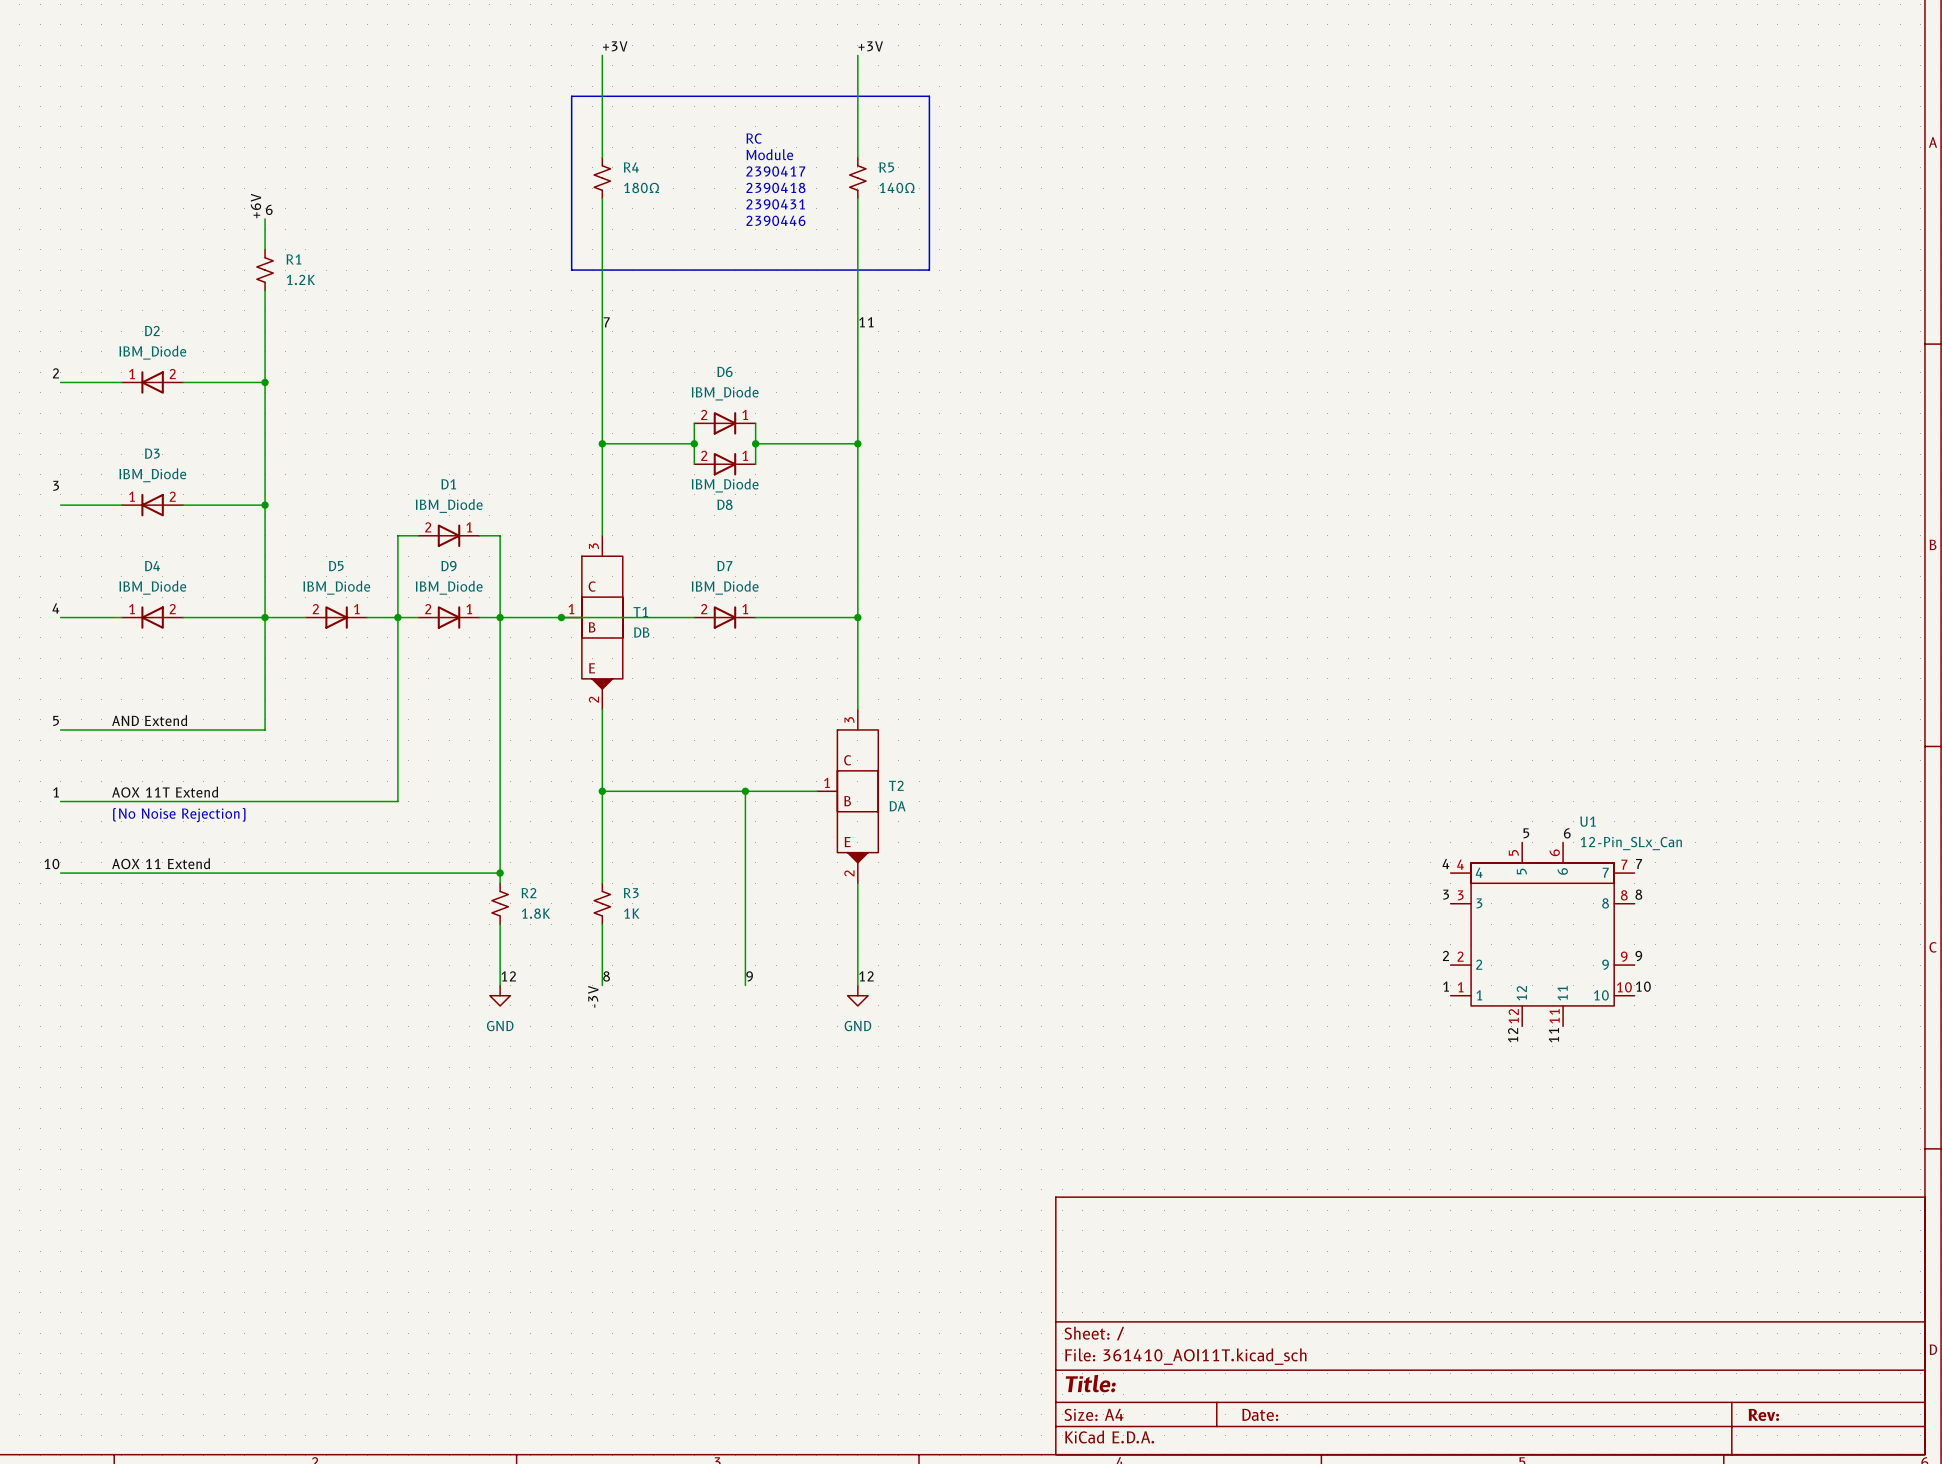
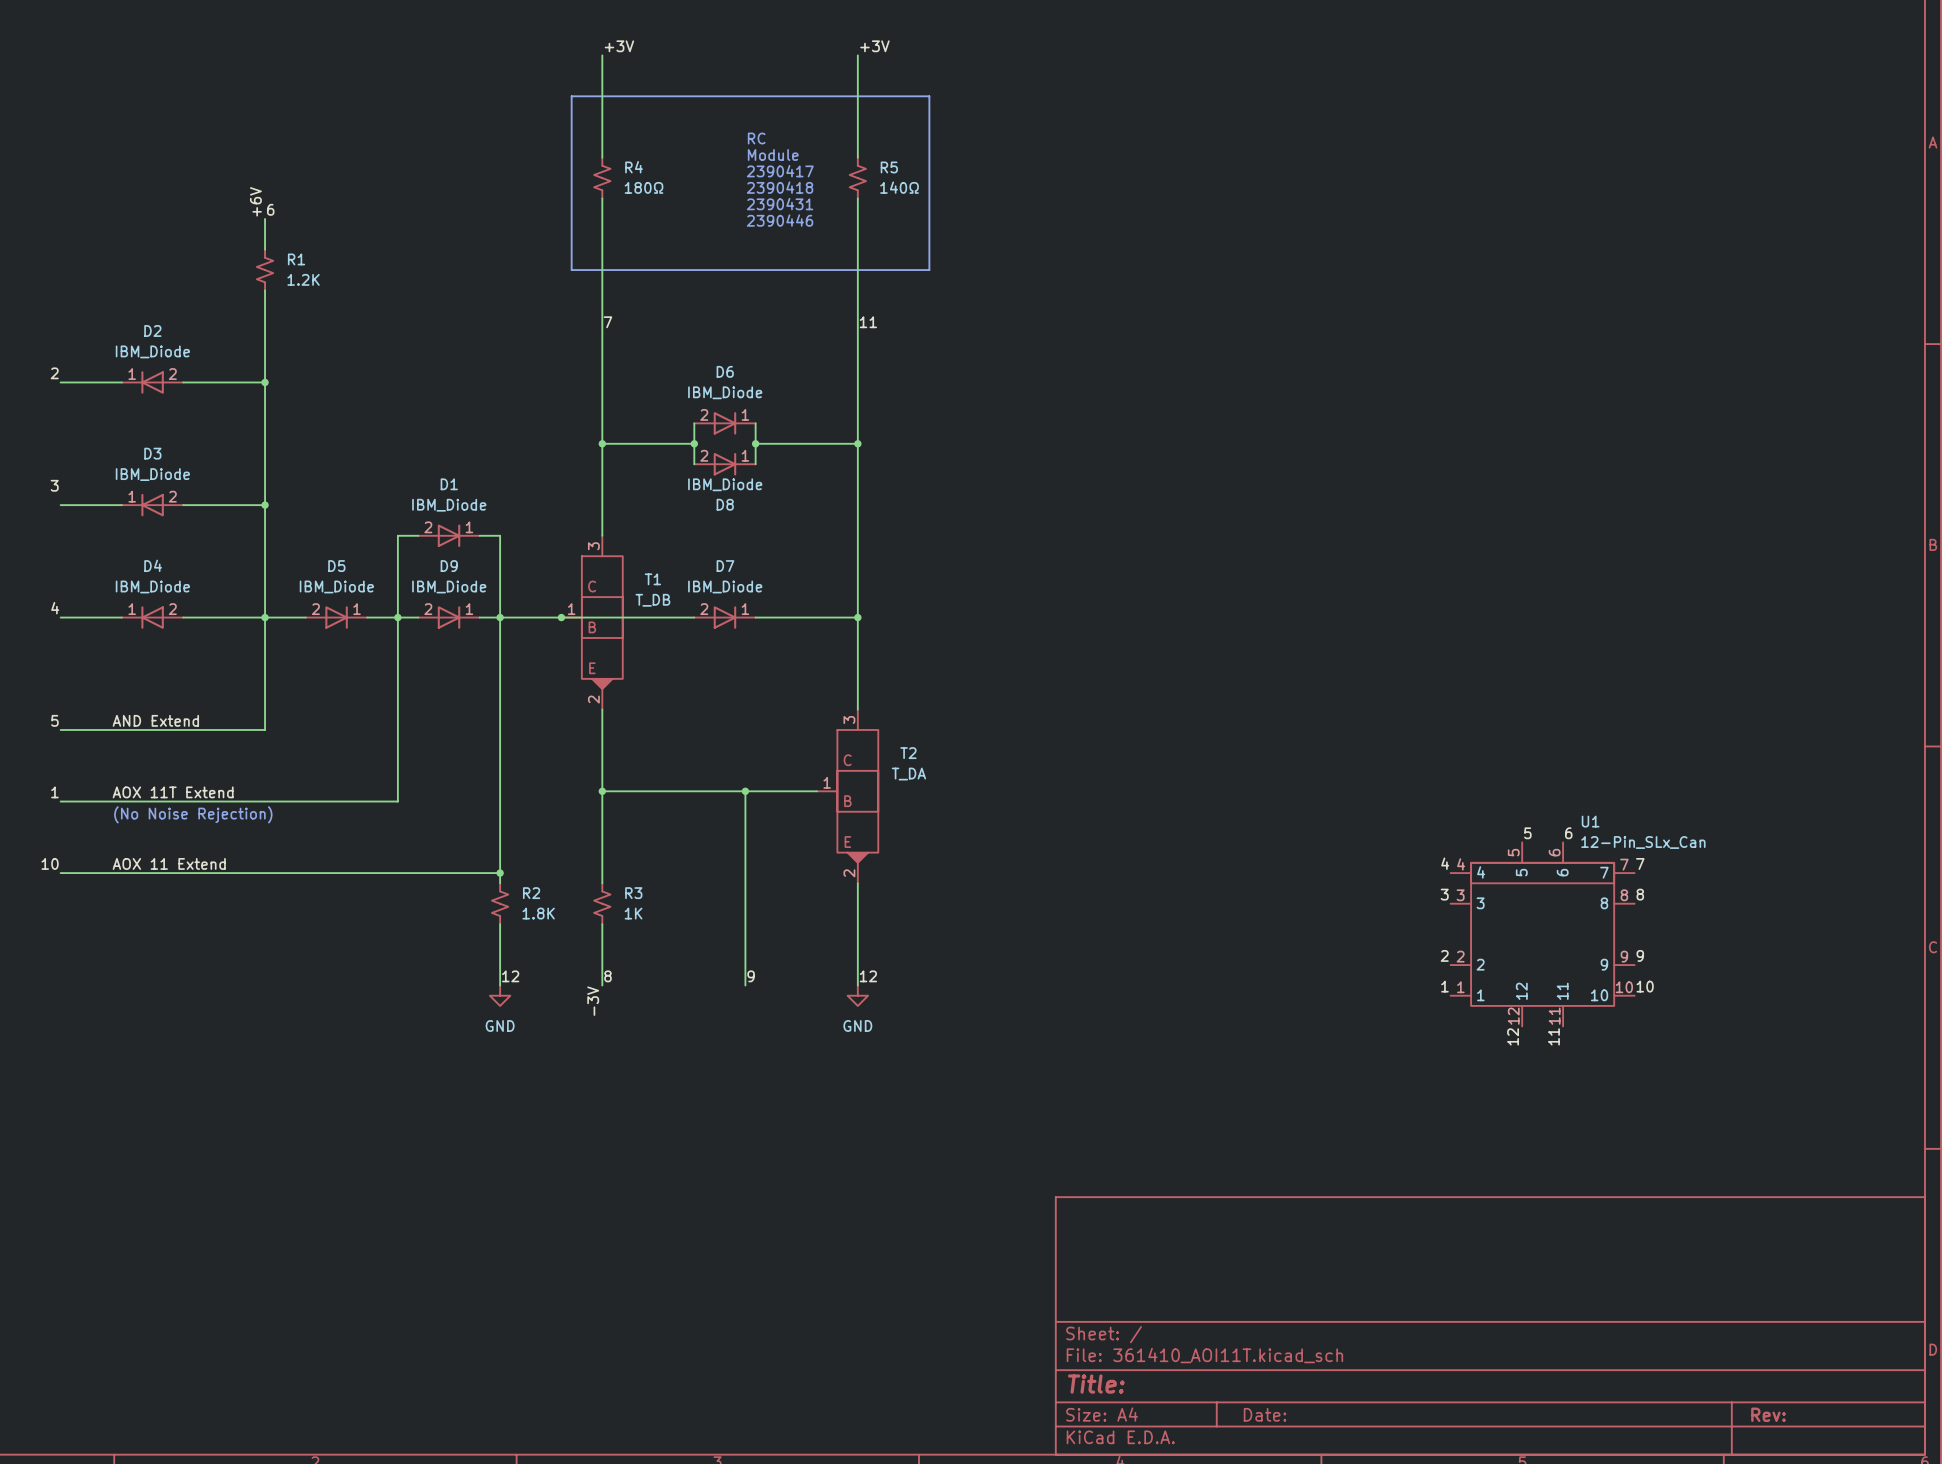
T1 name position: T1 (640, 612) -> T1 (652, 579)
T1 value: DB (641, 632) -> T_DB (652, 600)
T2 name position: T2 (896, 785) -> T2 (908, 753)
T2 value: DA (897, 806) -> T_DA (908, 774)

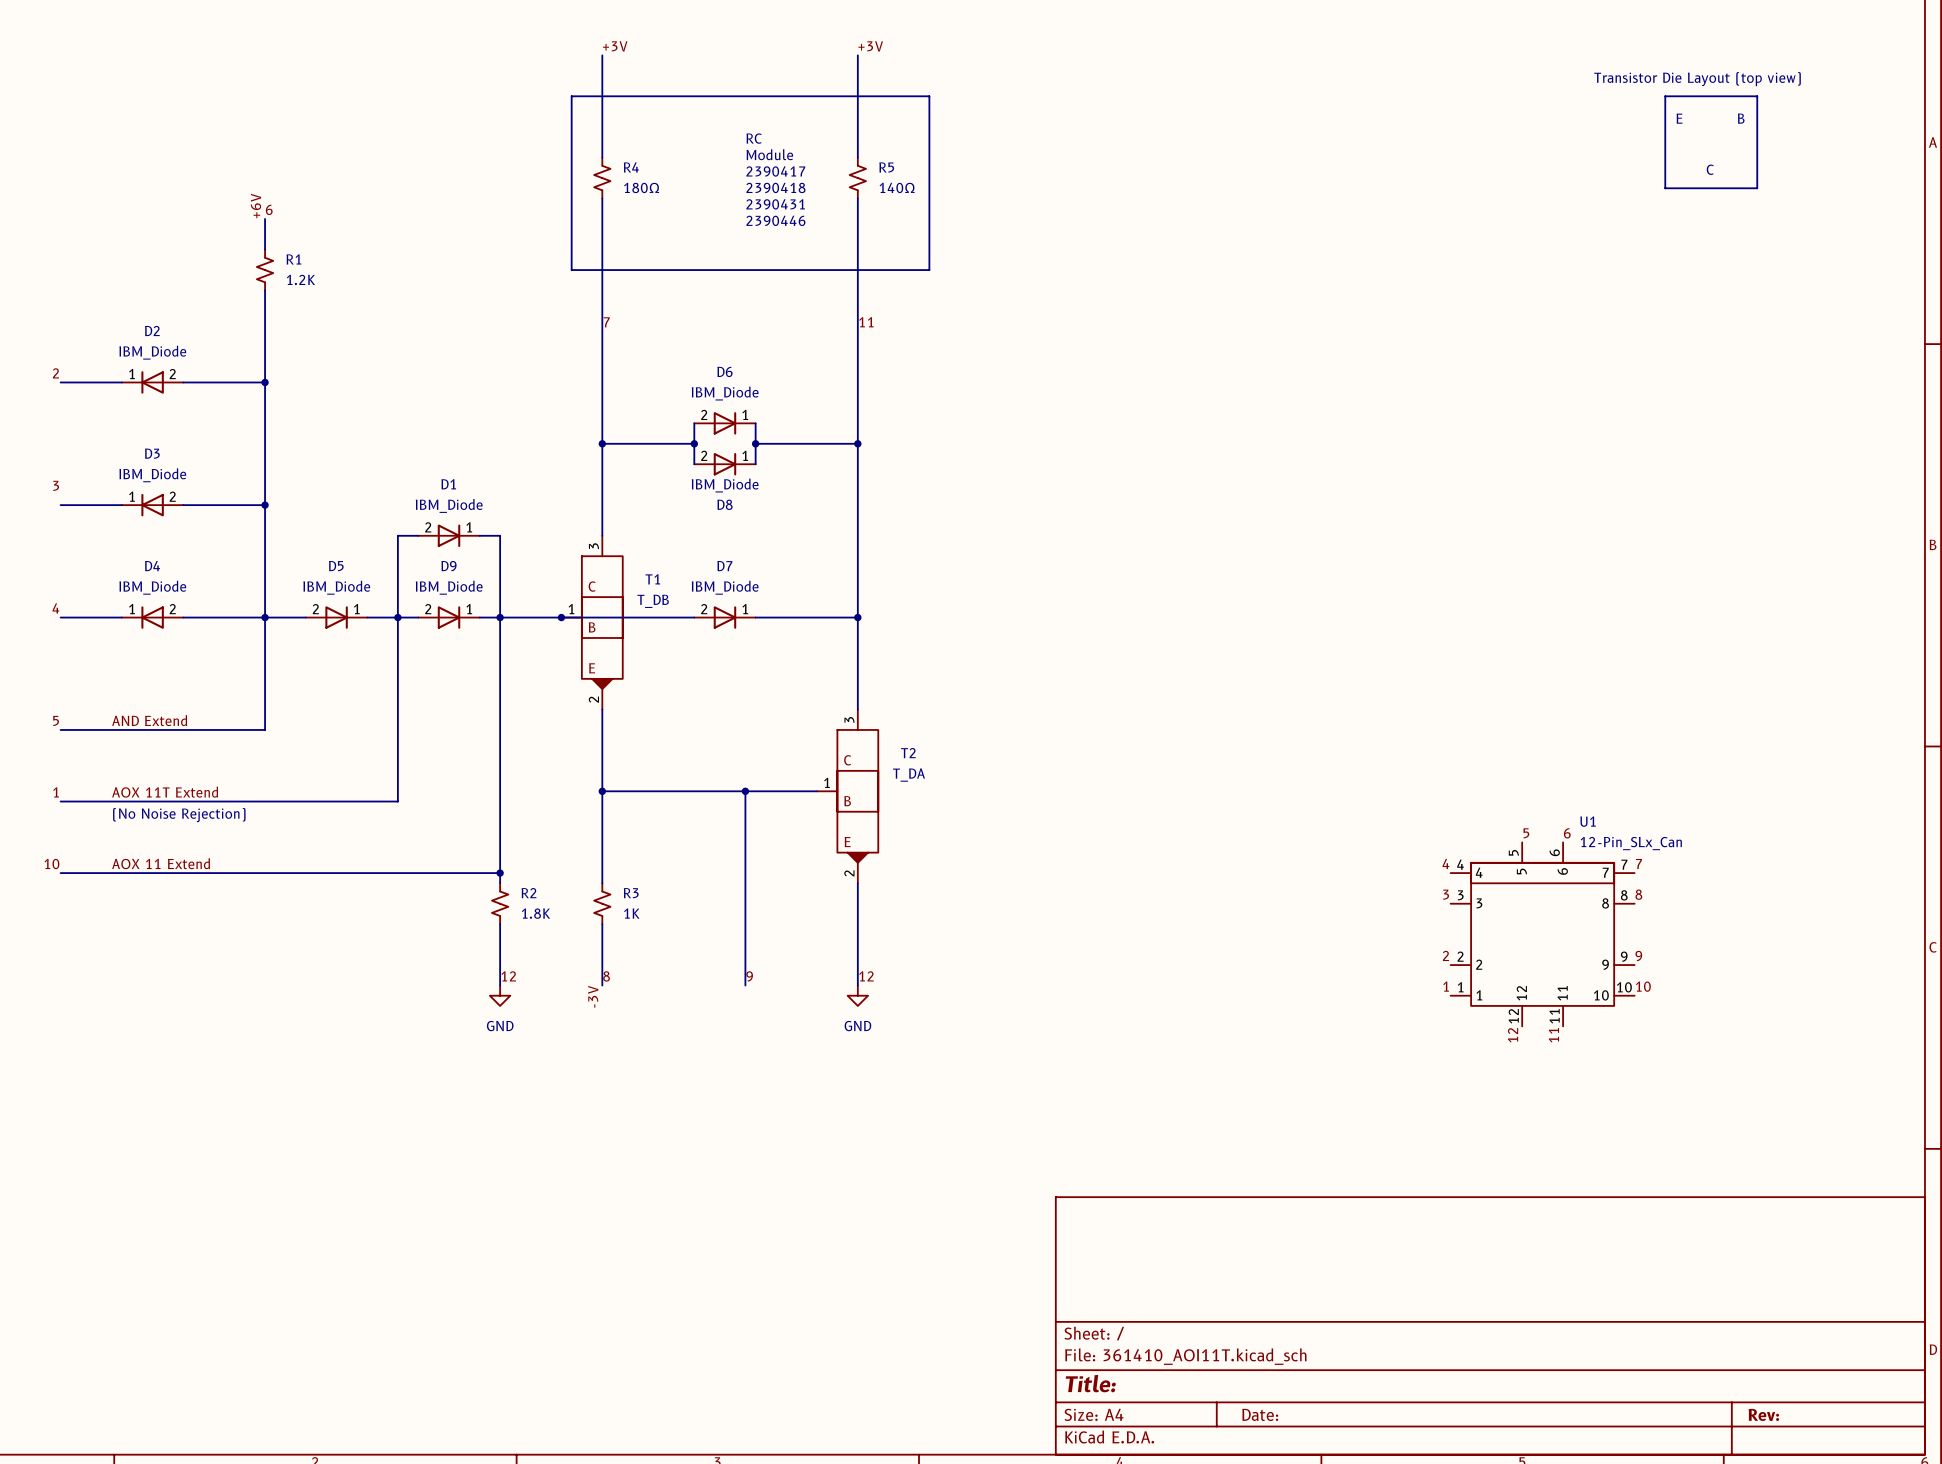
text: none -> Transistor Die Layout (top view) (1697, 79)
line: none -> (1665, 96) (1665, 188) (1757, 188) (1757, 96) (1665, 96)
text: none -> E (1679, 118)
text: none -> B (1741, 118)
text: none -> C (1710, 169)

